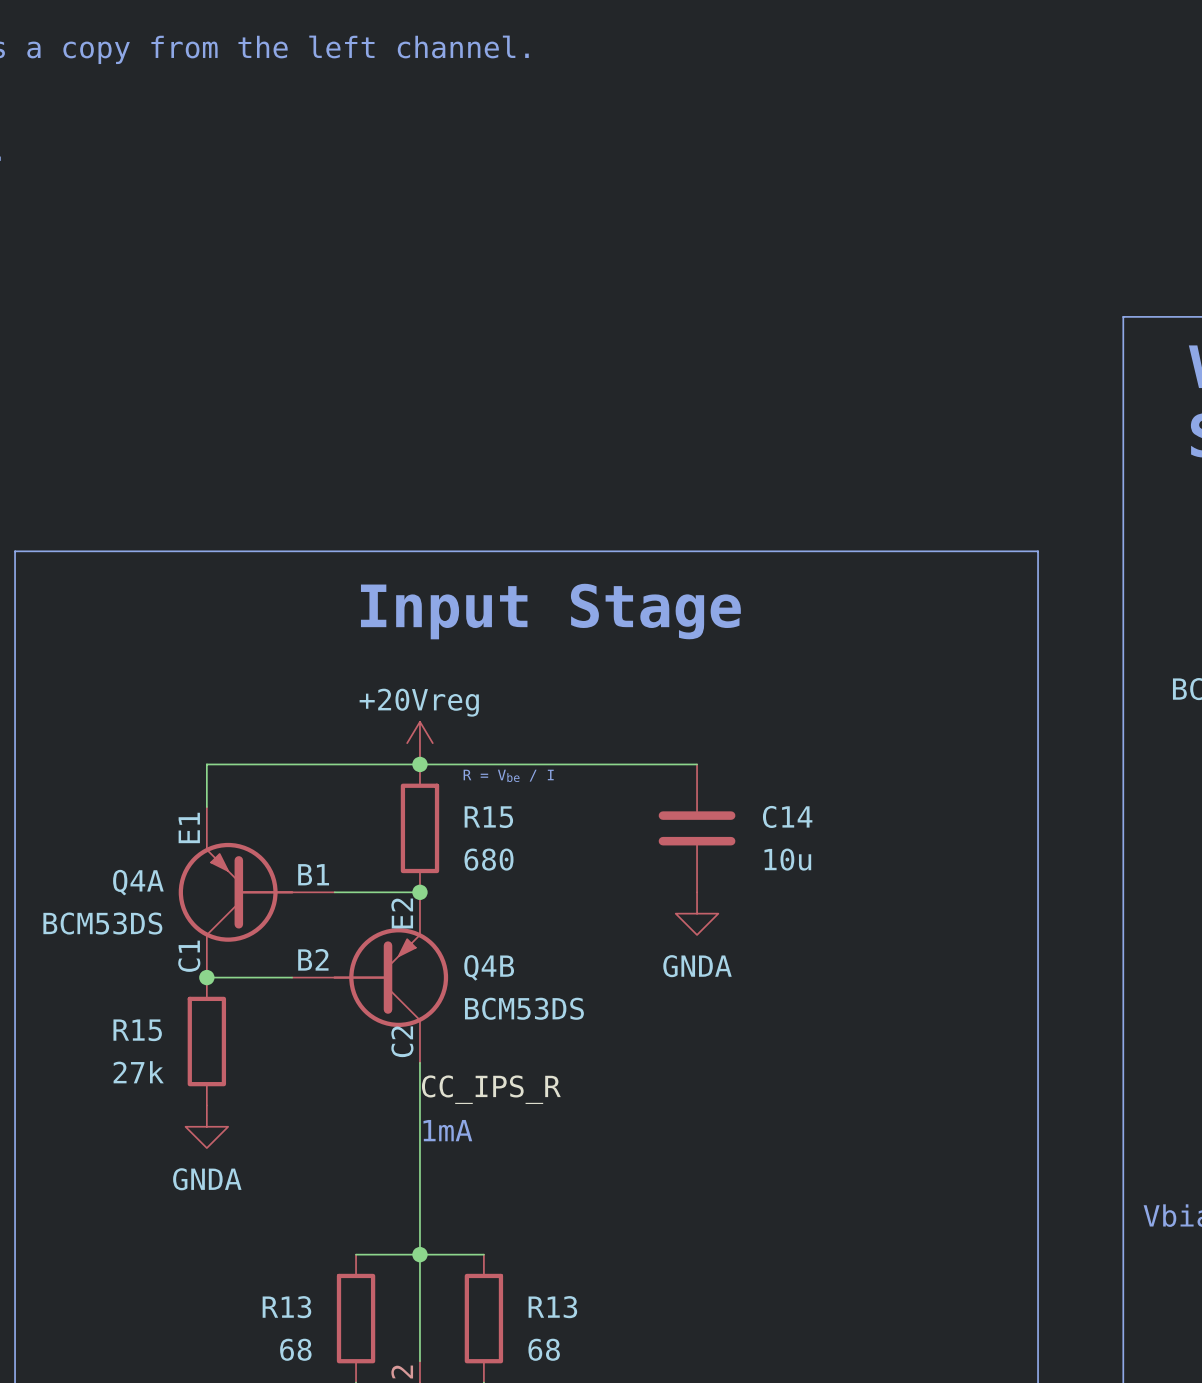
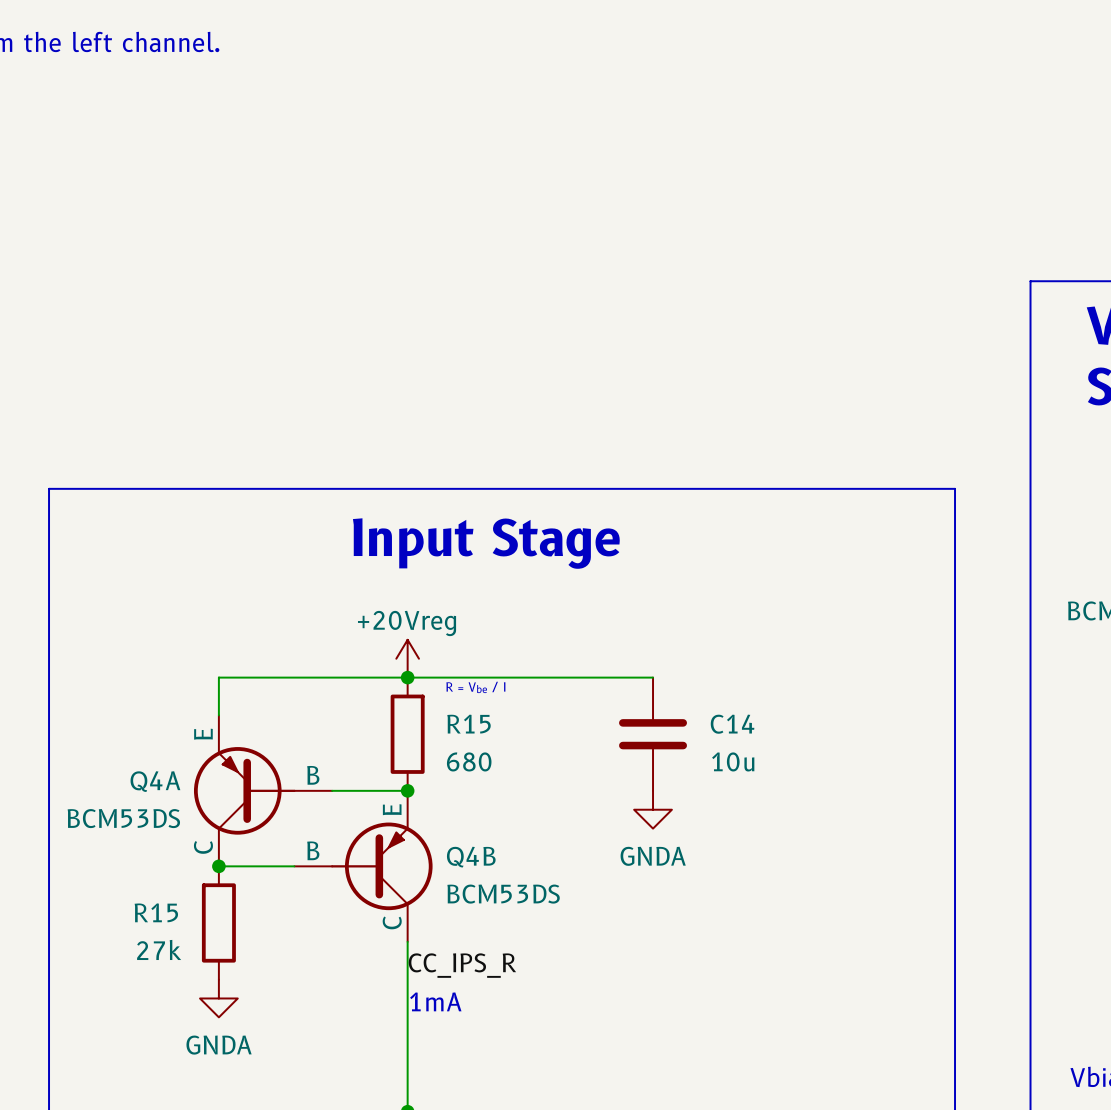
Q4A pin name: E1 (189, 827) -> E (203, 734)
Q4A pin name: B1 (313, 874) -> B (313, 775)
Q4B pin name: E2 (402, 913) -> E (392, 809)
Q4A pin name: C1 (189, 956) -> C (203, 847)
Q4B pin name: B2 (313, 959) -> B (313, 850)
Q4B pin name: C2 (402, 1041) -> C (392, 922)

